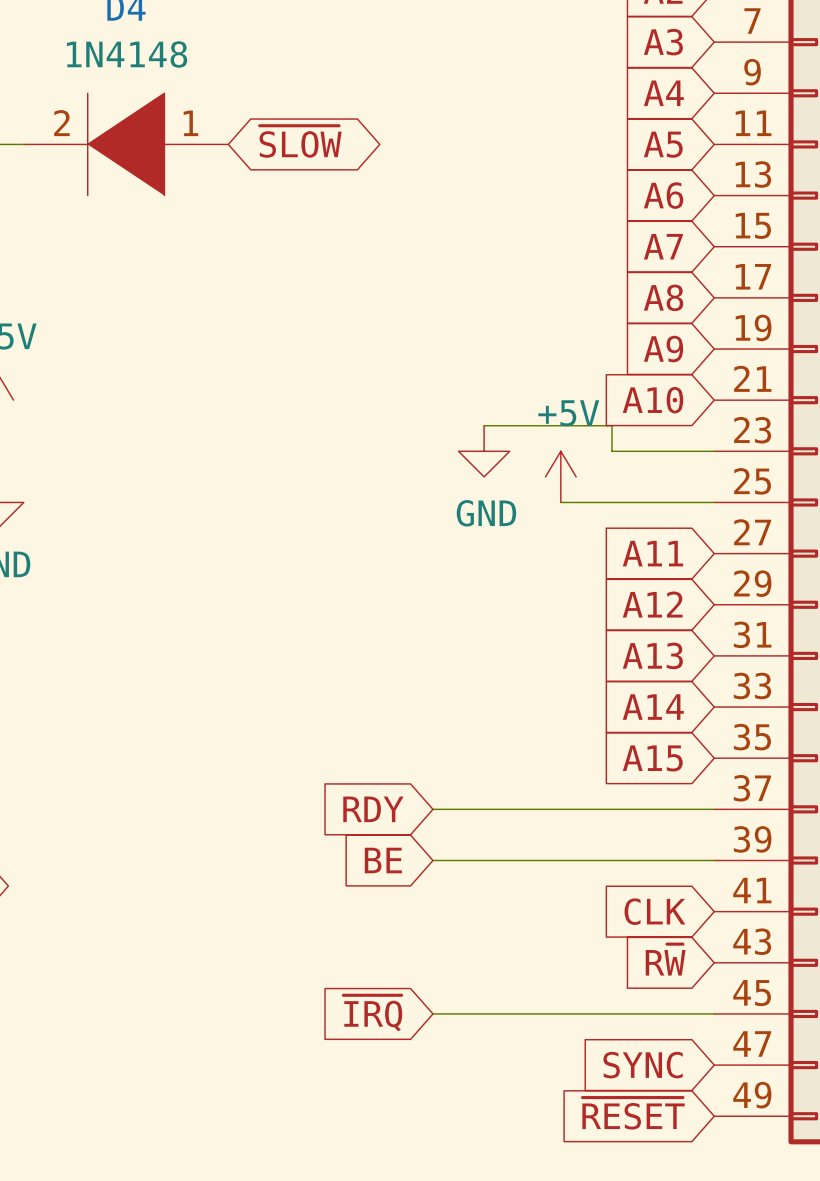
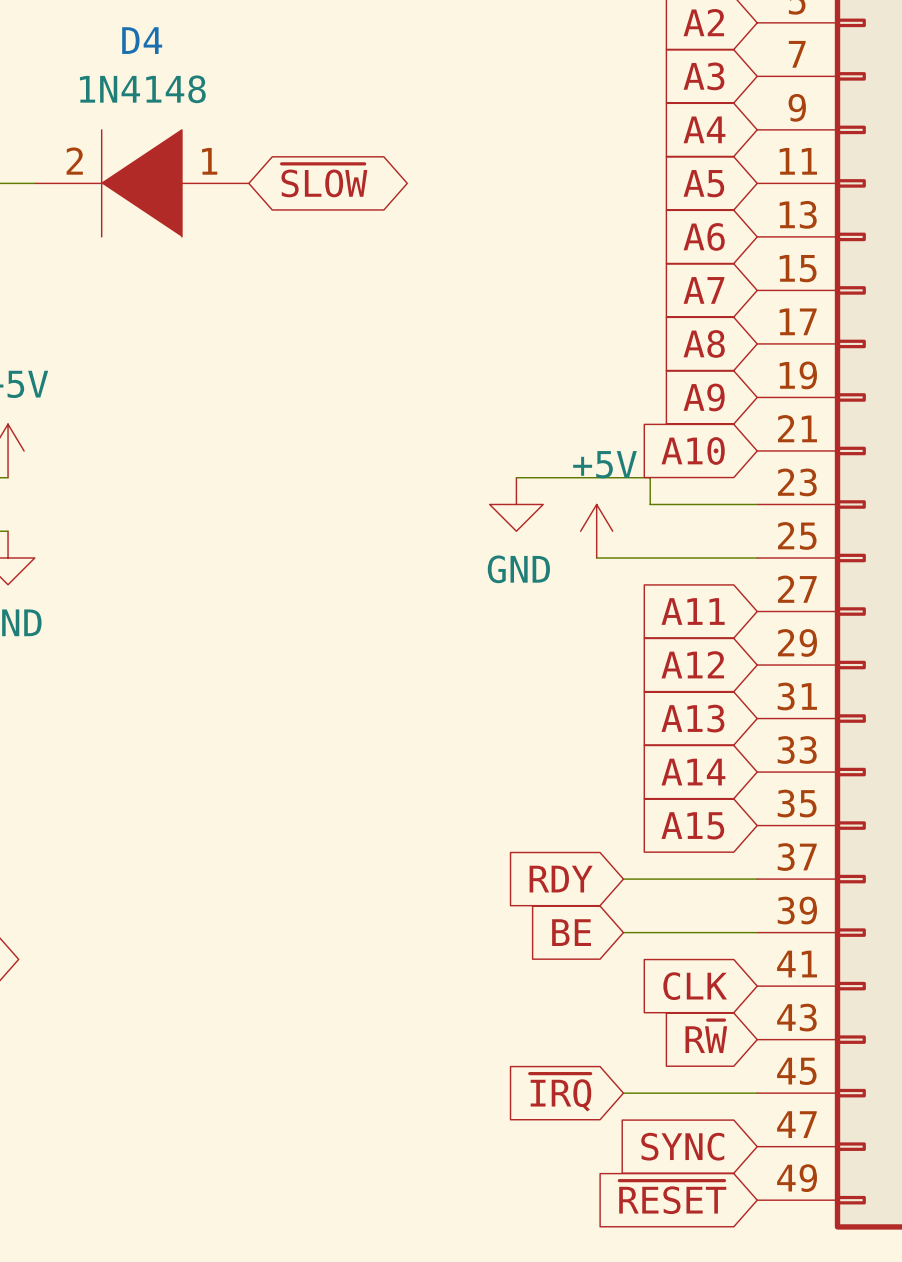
global label position: RDY (373, 809) -> RDY (561, 879)
wire: (432, 809) (586, 809) -> none
global label position: BE (383, 860) -> BE (571, 932)
wire: (432, 860) (586, 860) -> none
global label position: ~{IRQ} (372, 1013) -> ~{IRQ} (560, 1092)
wire: (432, 1013) (586, 1013) -> none

